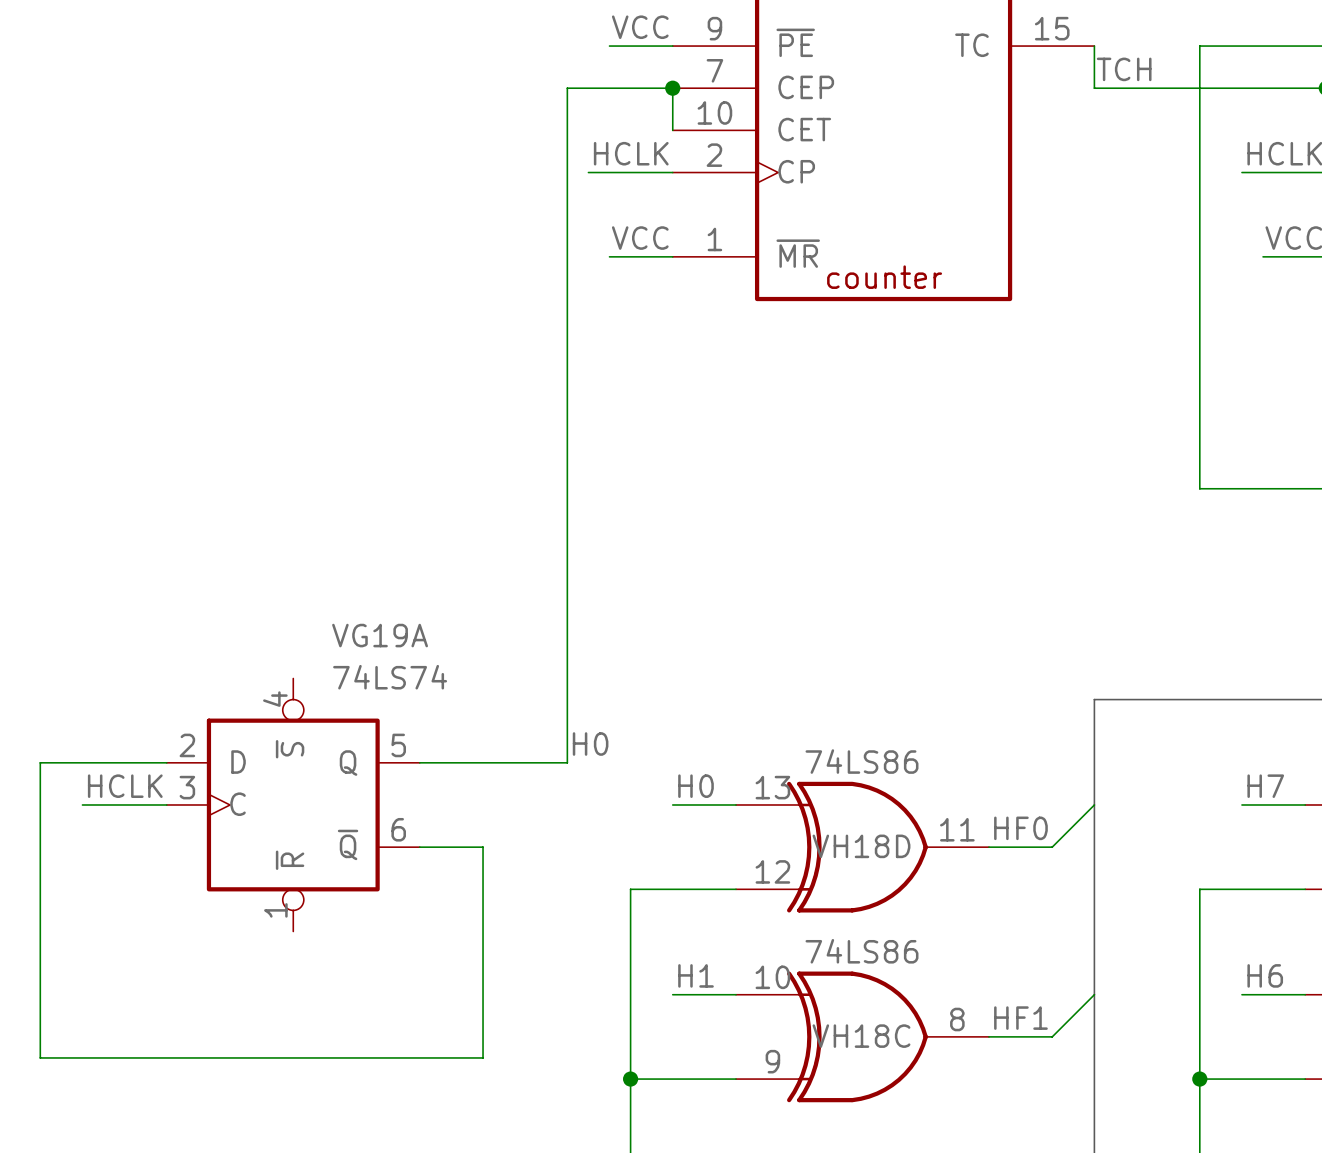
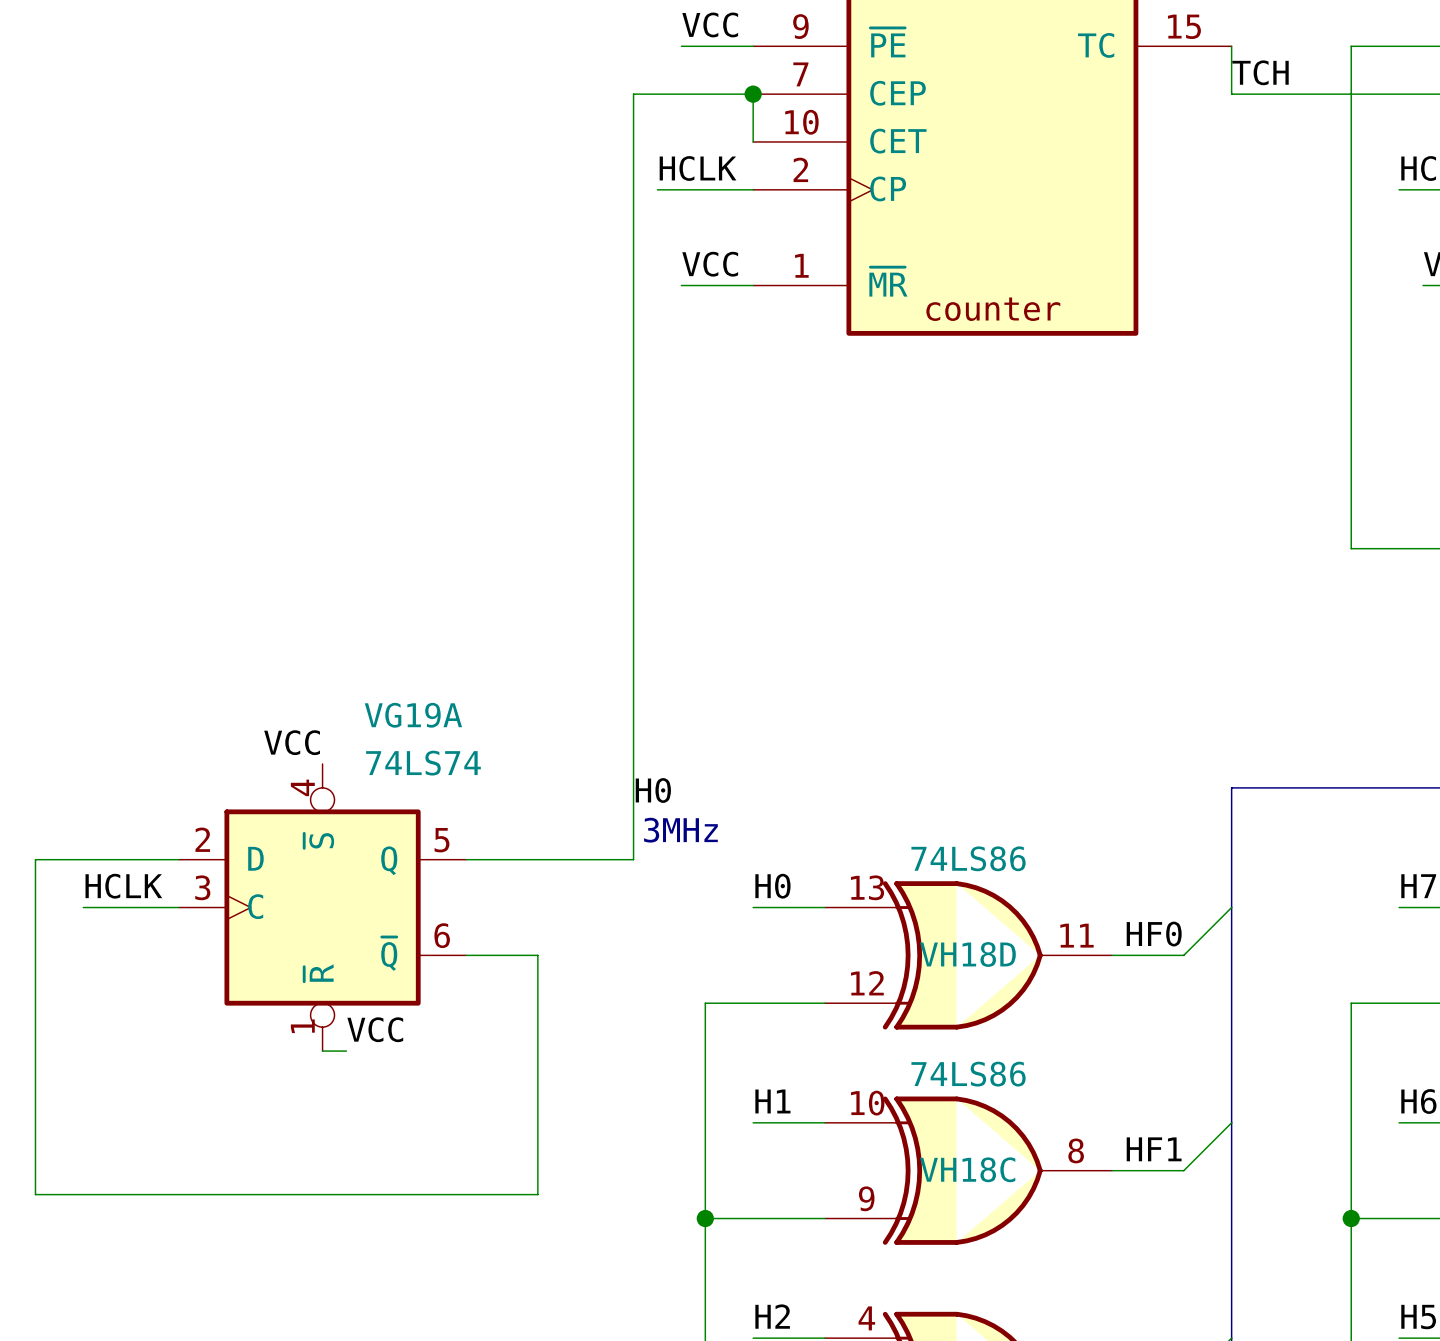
label: none -> VCC (292, 742)
text: none -> 3MHz (680, 830)
label position: H0 (590, 744) -> H0 (653, 790)
label: none -> VCC (375, 1029)
wire: none -> (322, 1051) (346, 1051)

